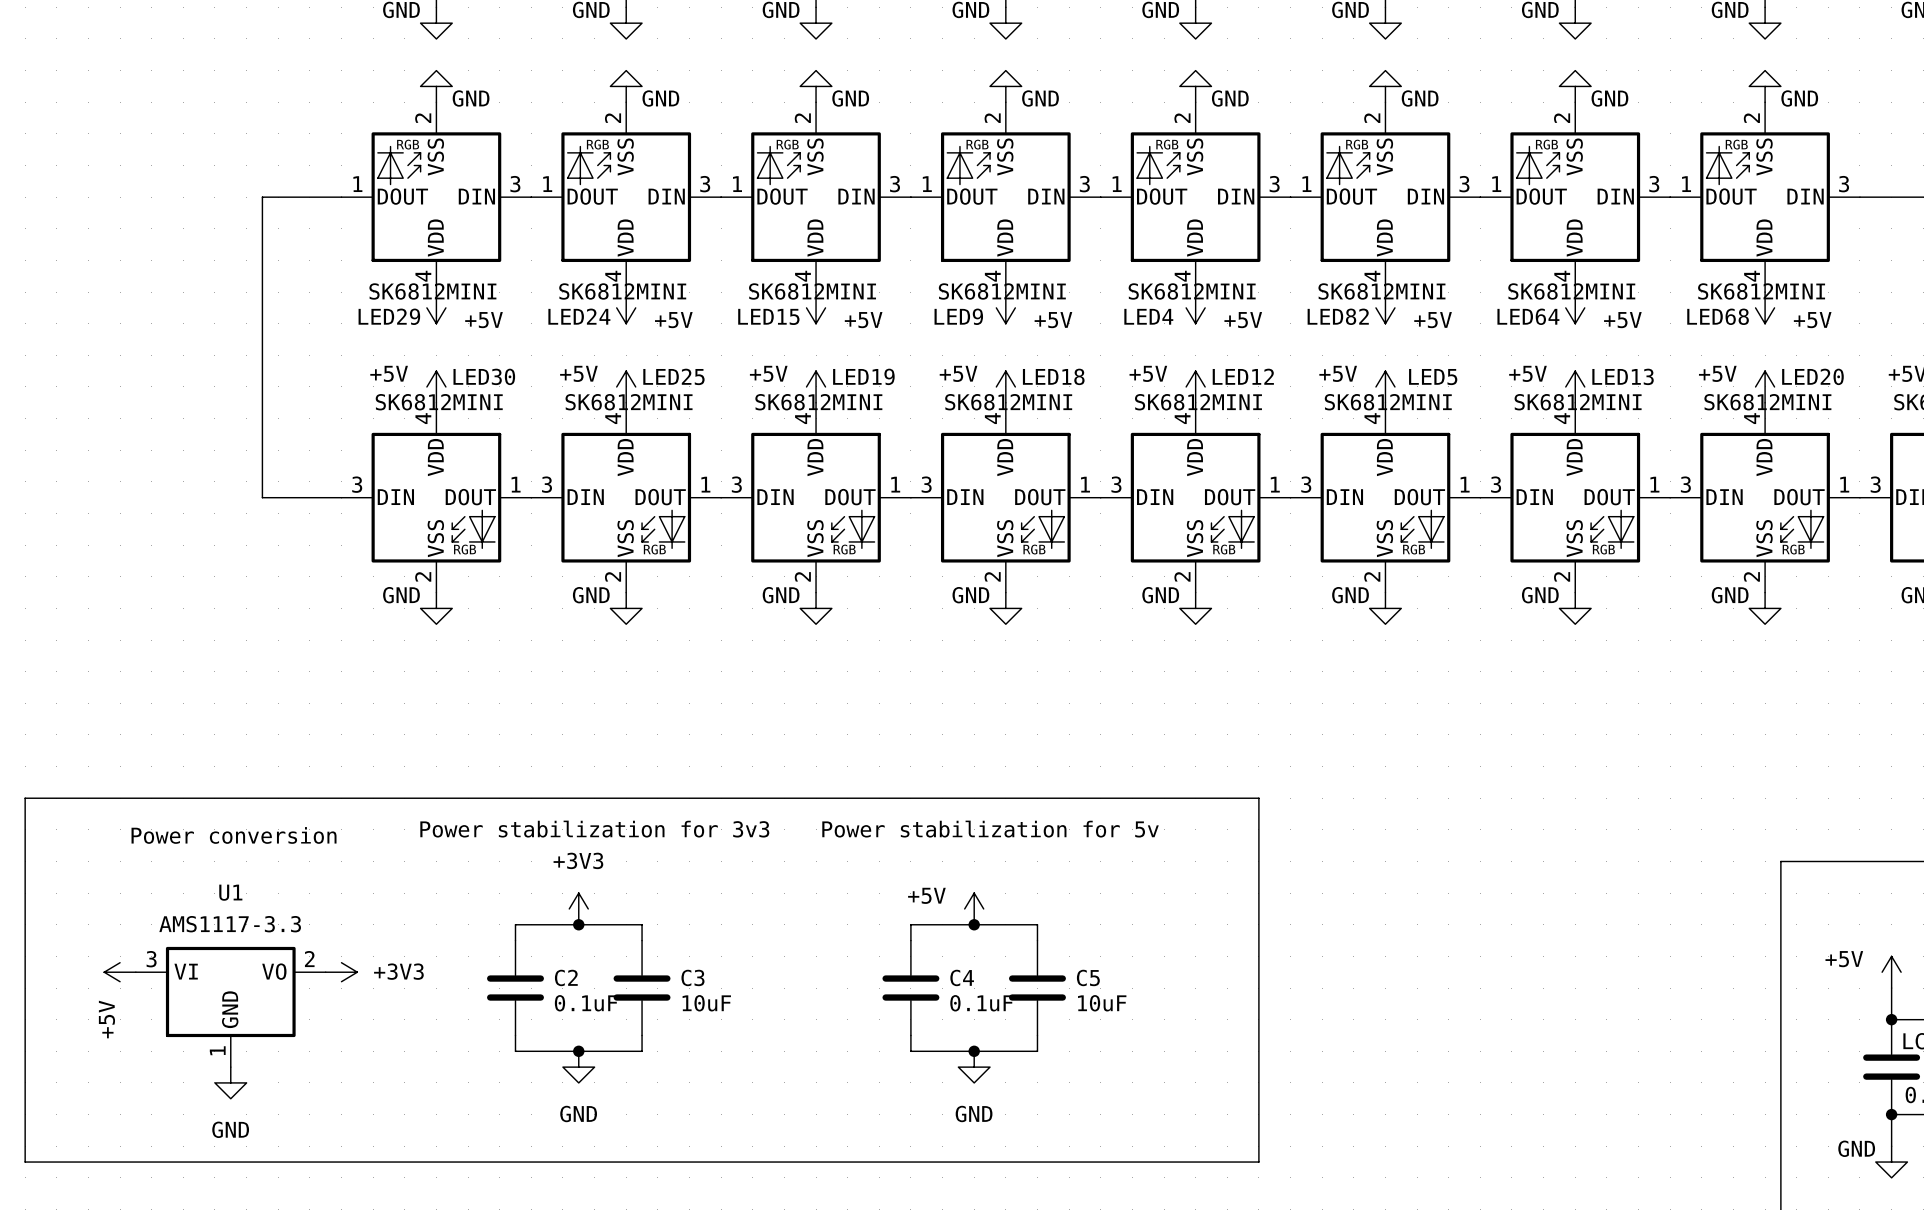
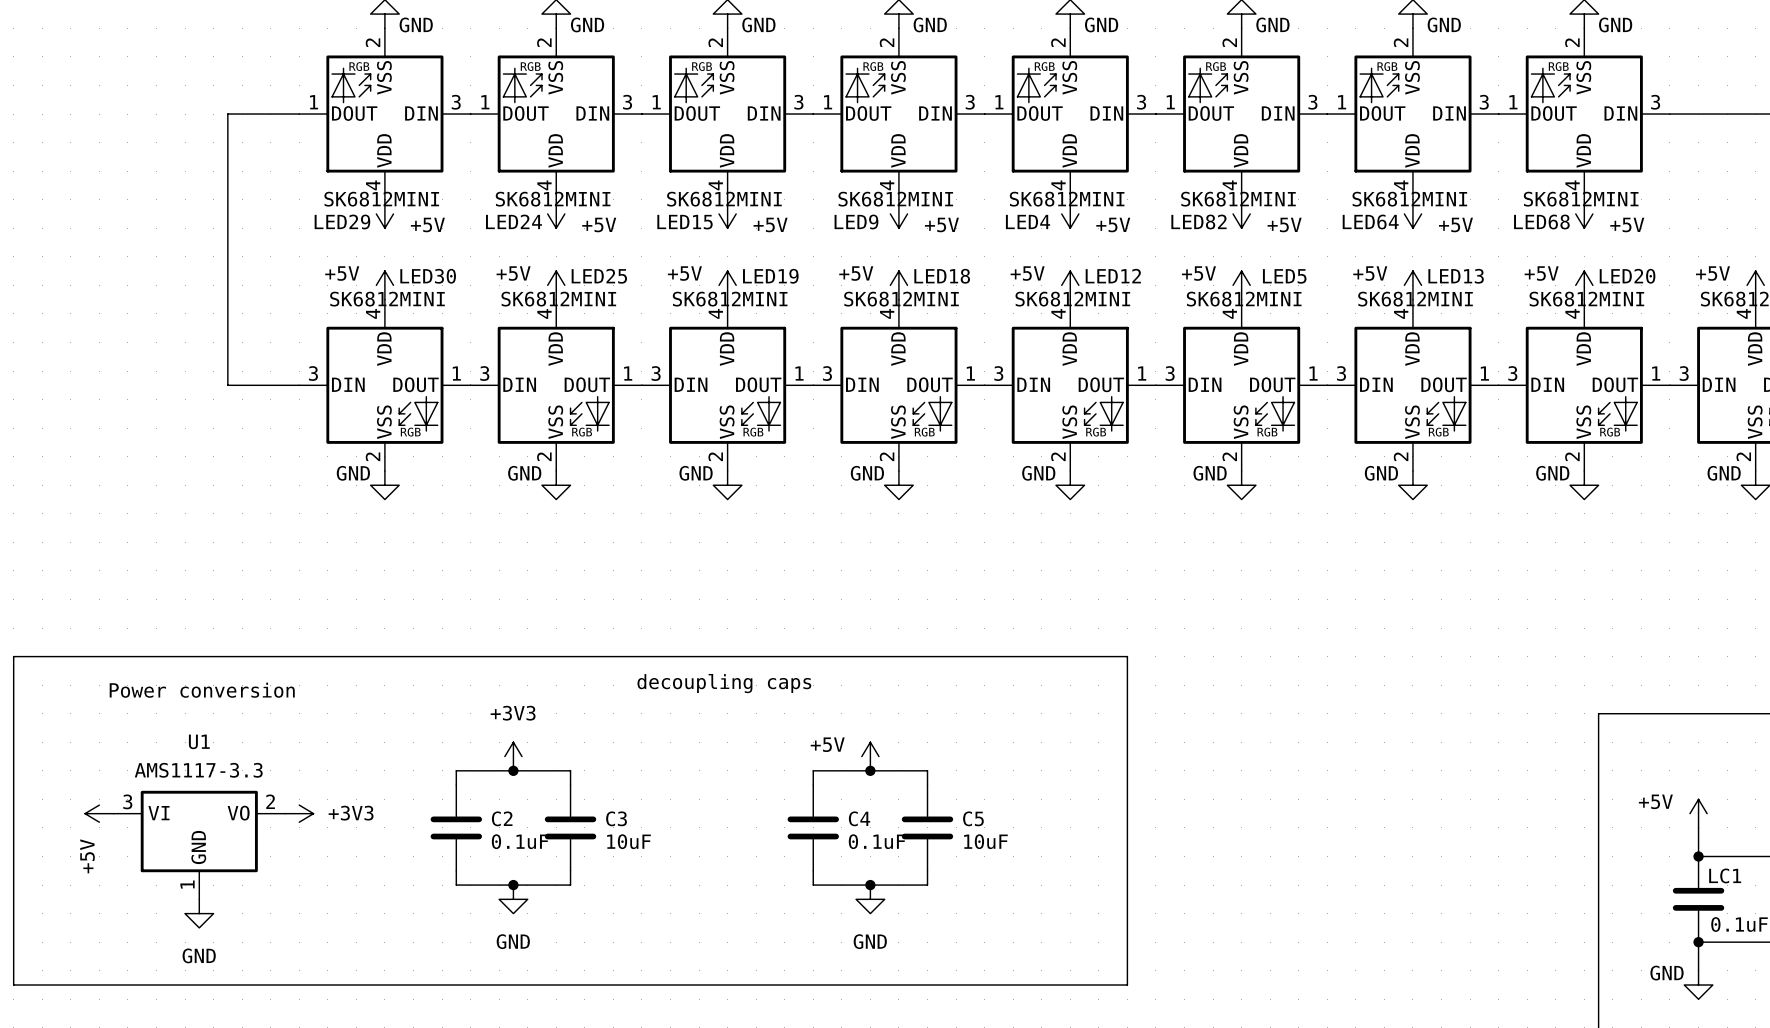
text: none -> decoupling caps (724, 683)
text: Power stabilization for 3v3 (594, 829) -> none
text: Power stabilization for 5v (990, 829) -> none

